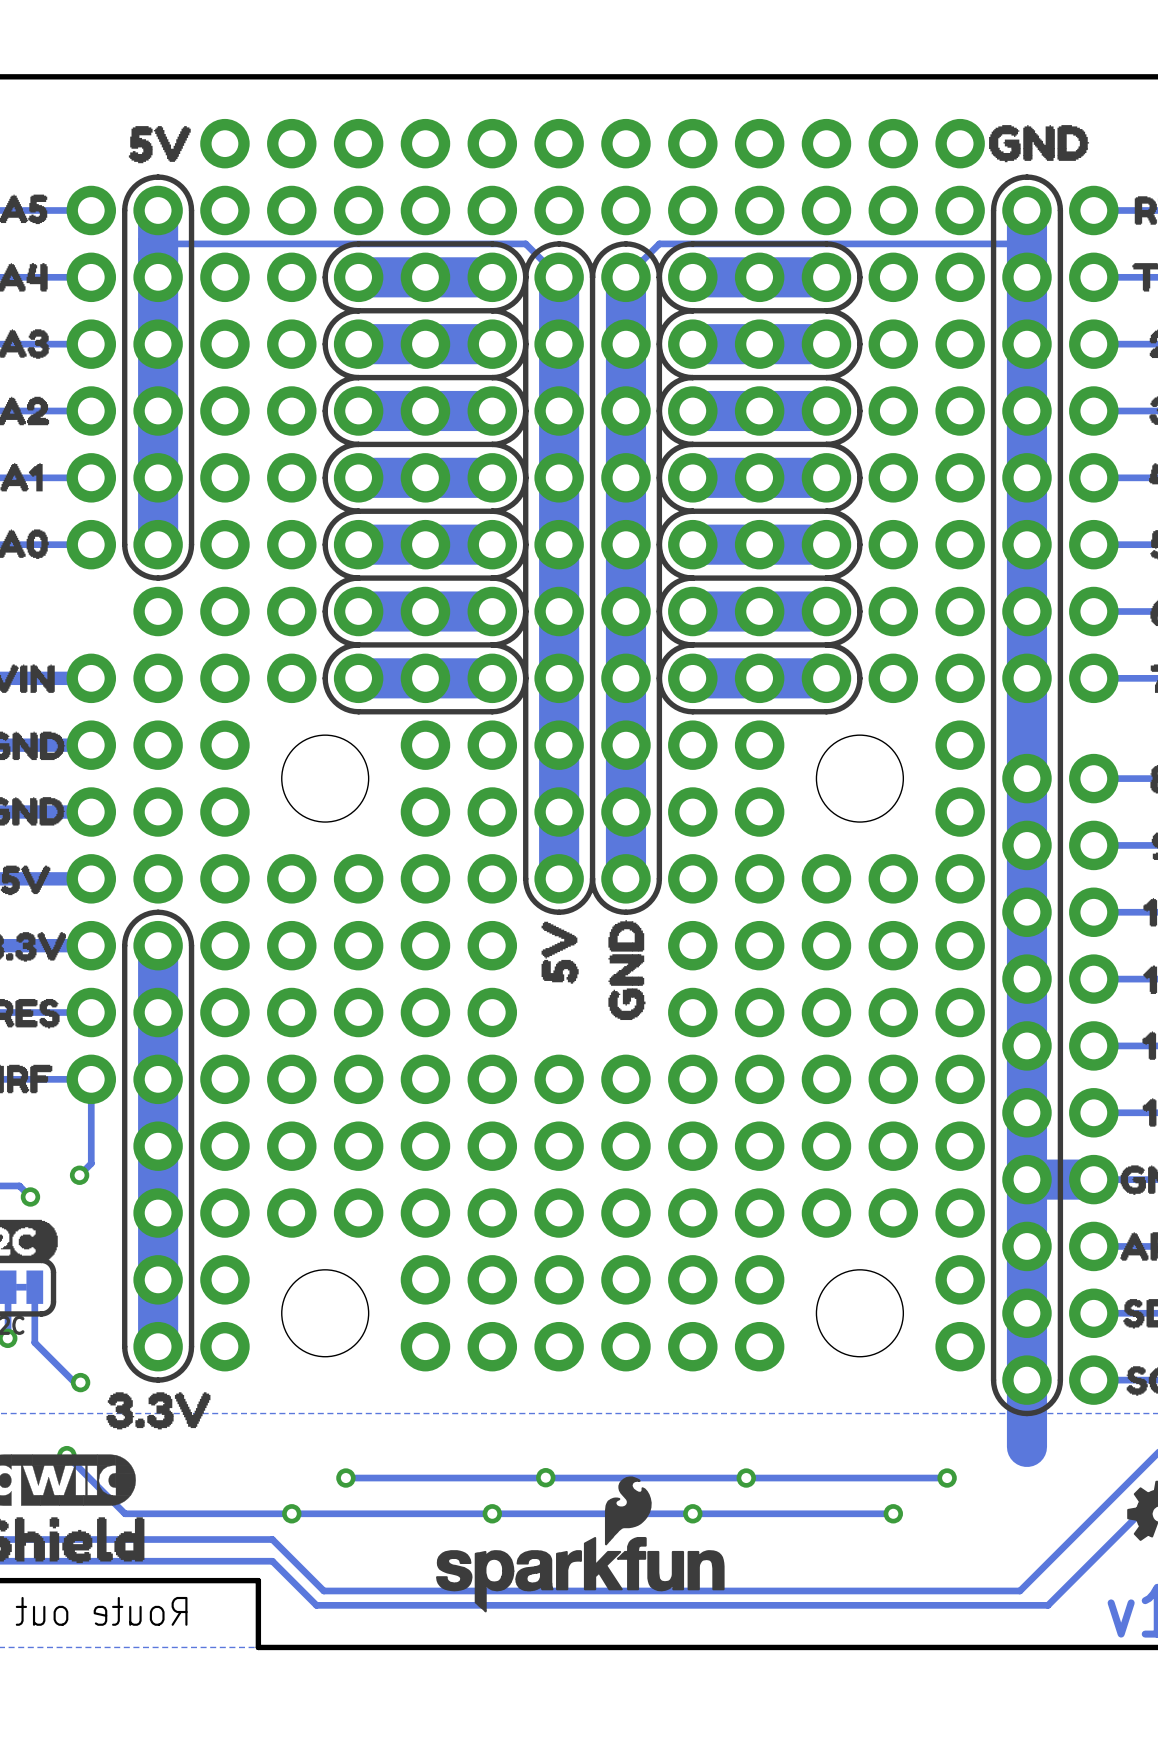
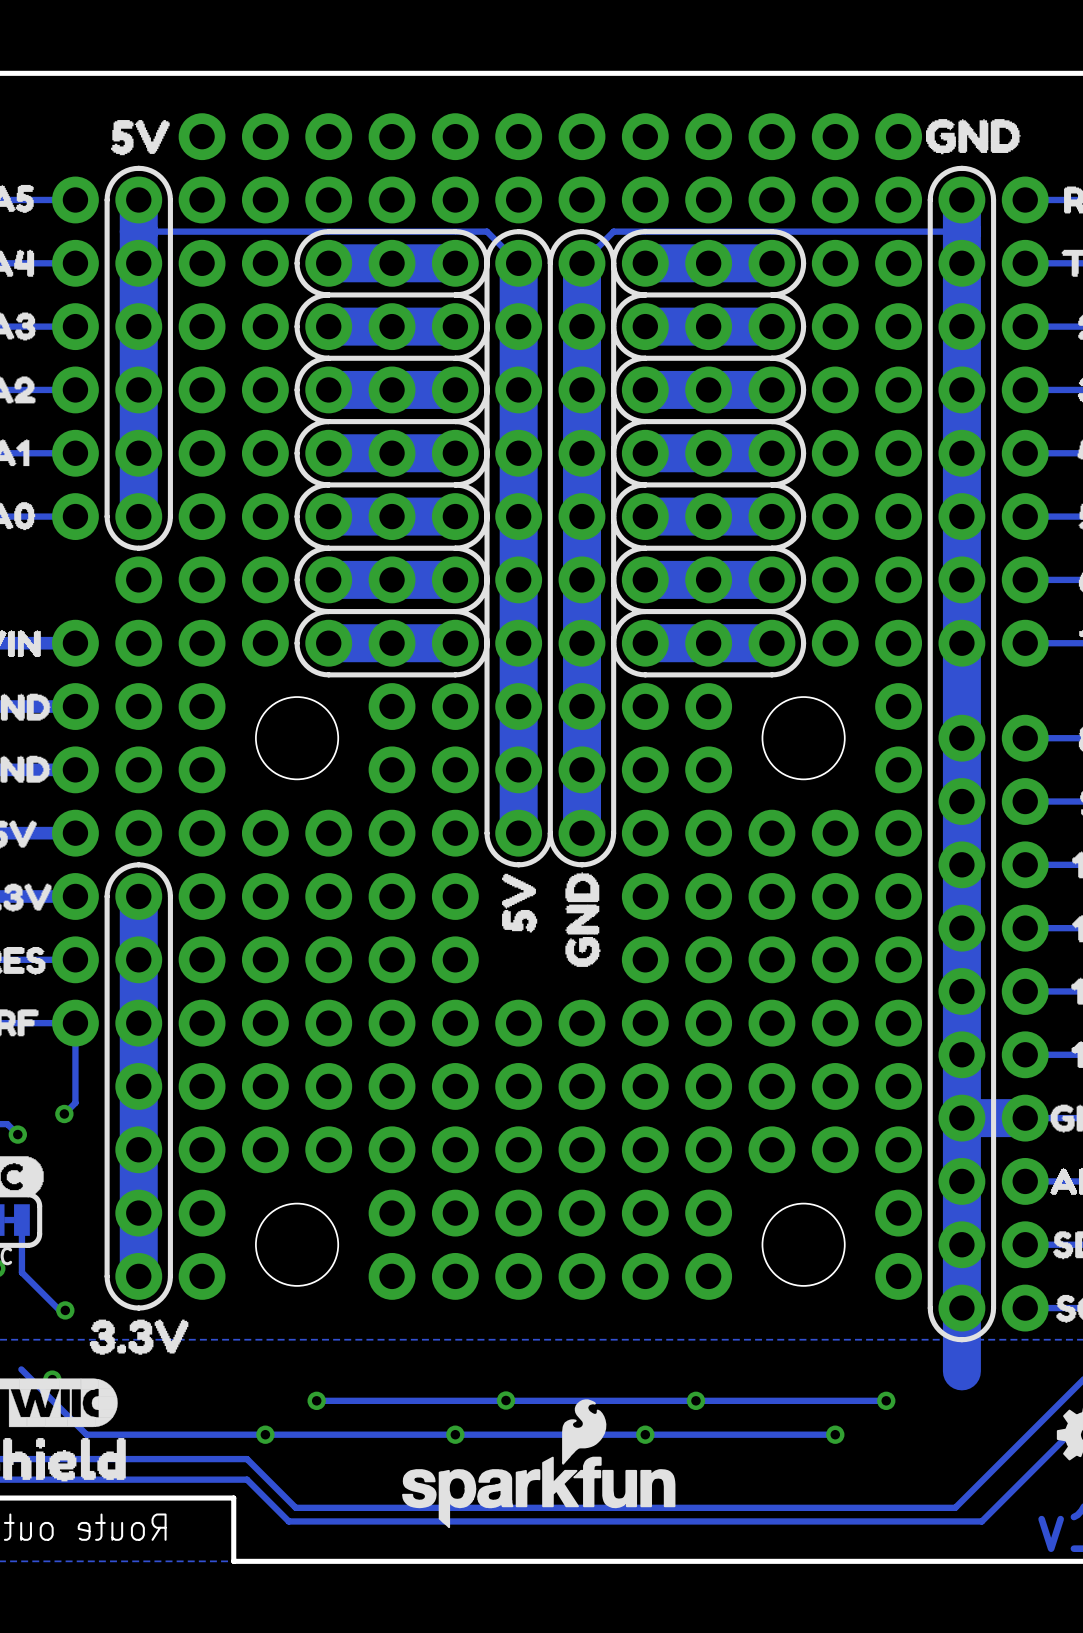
track: (66, 1455) (125, 1513) -> (21, 1369) (86, 1434) (107, 1434)

